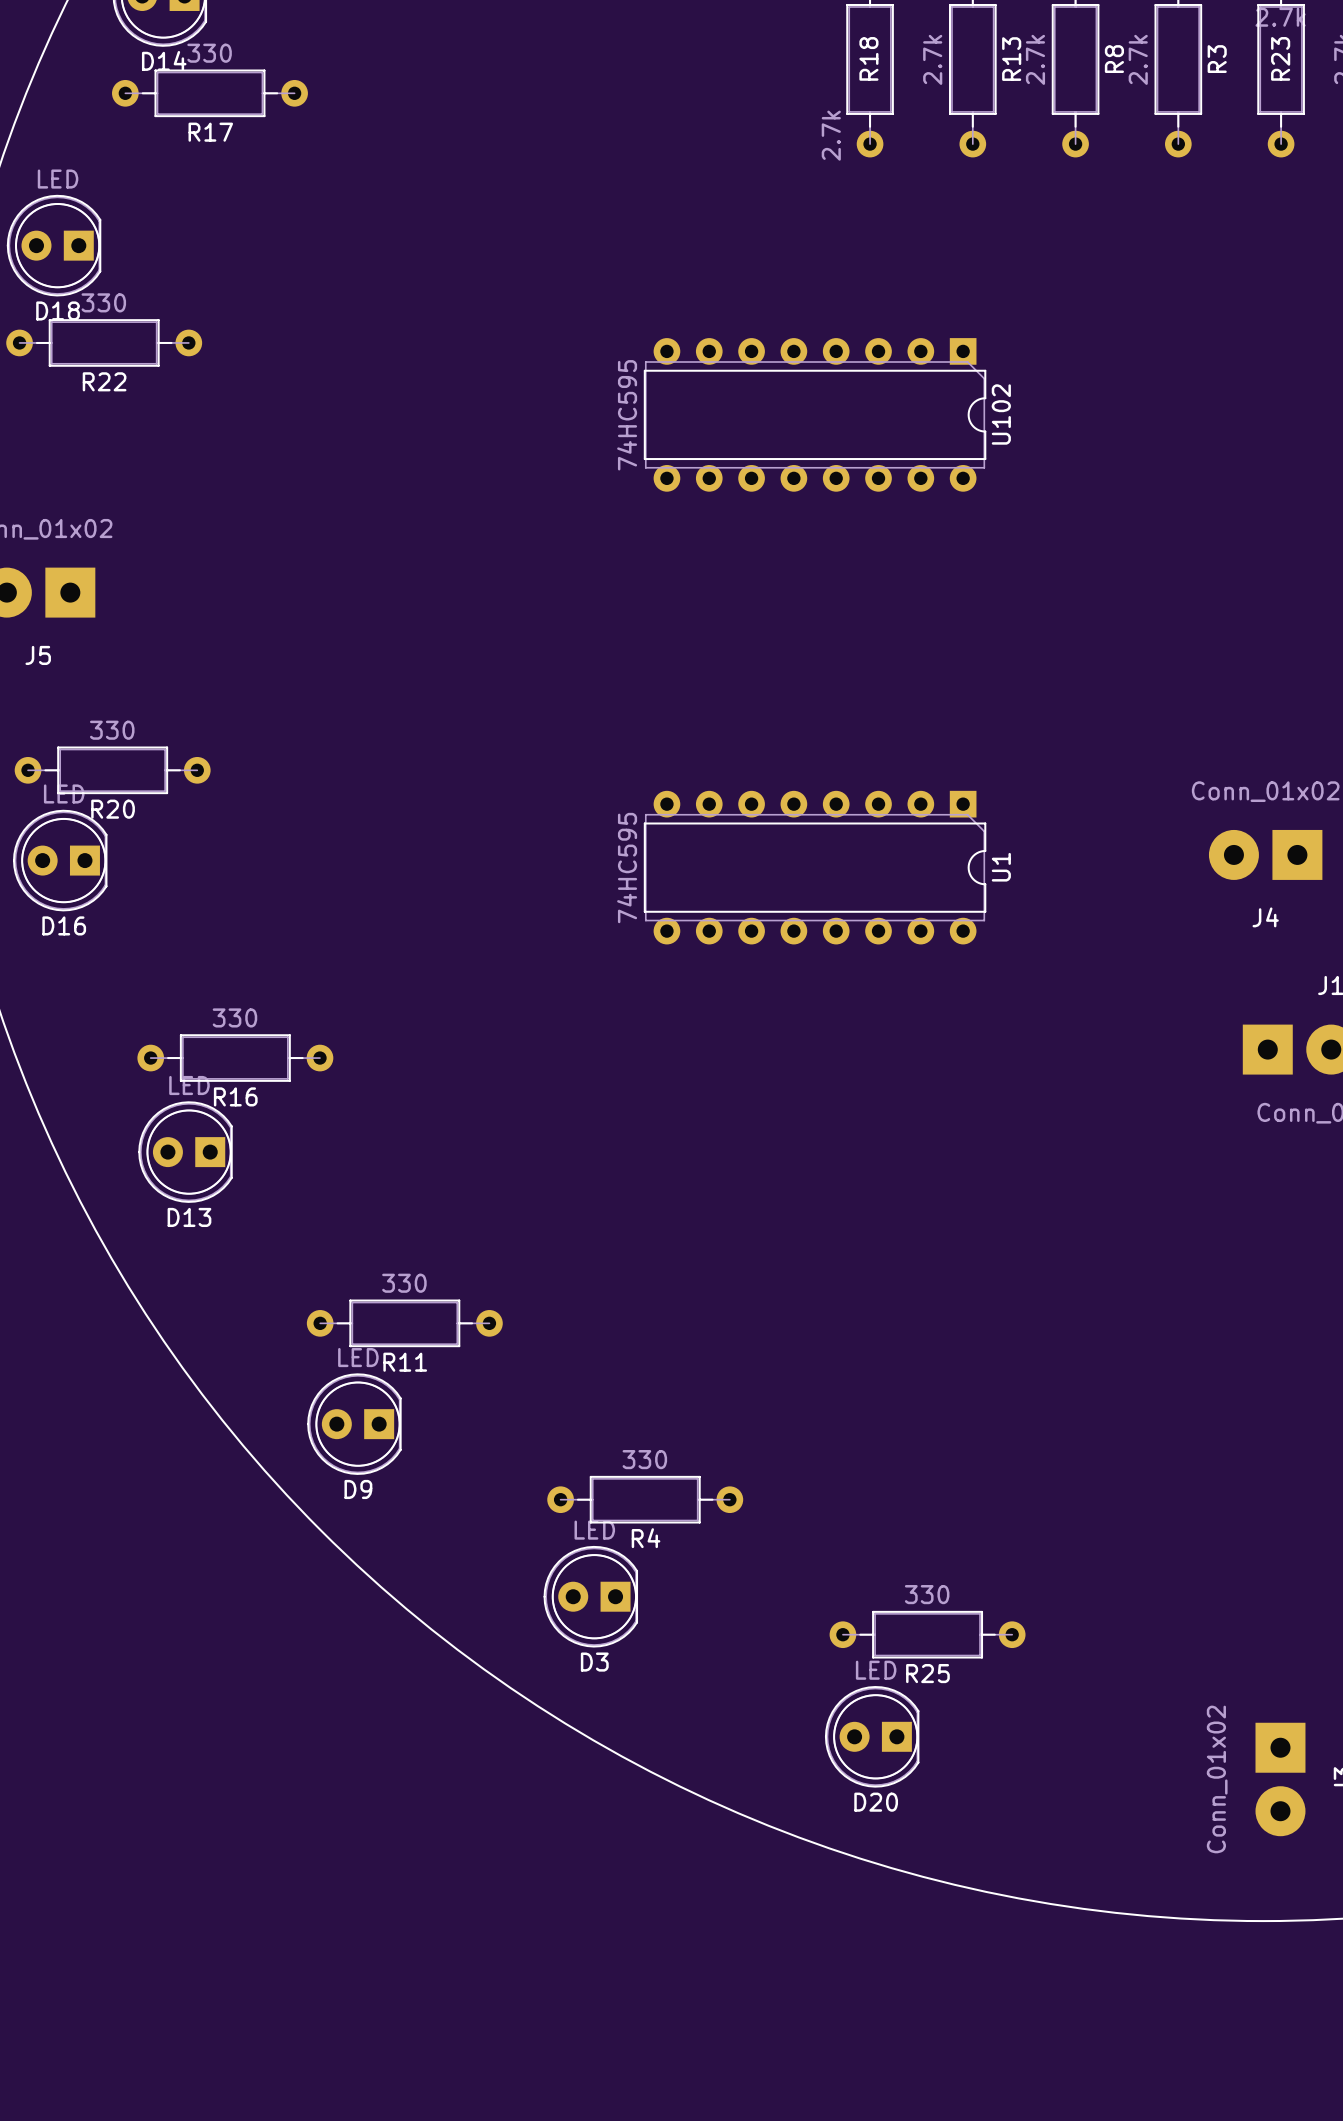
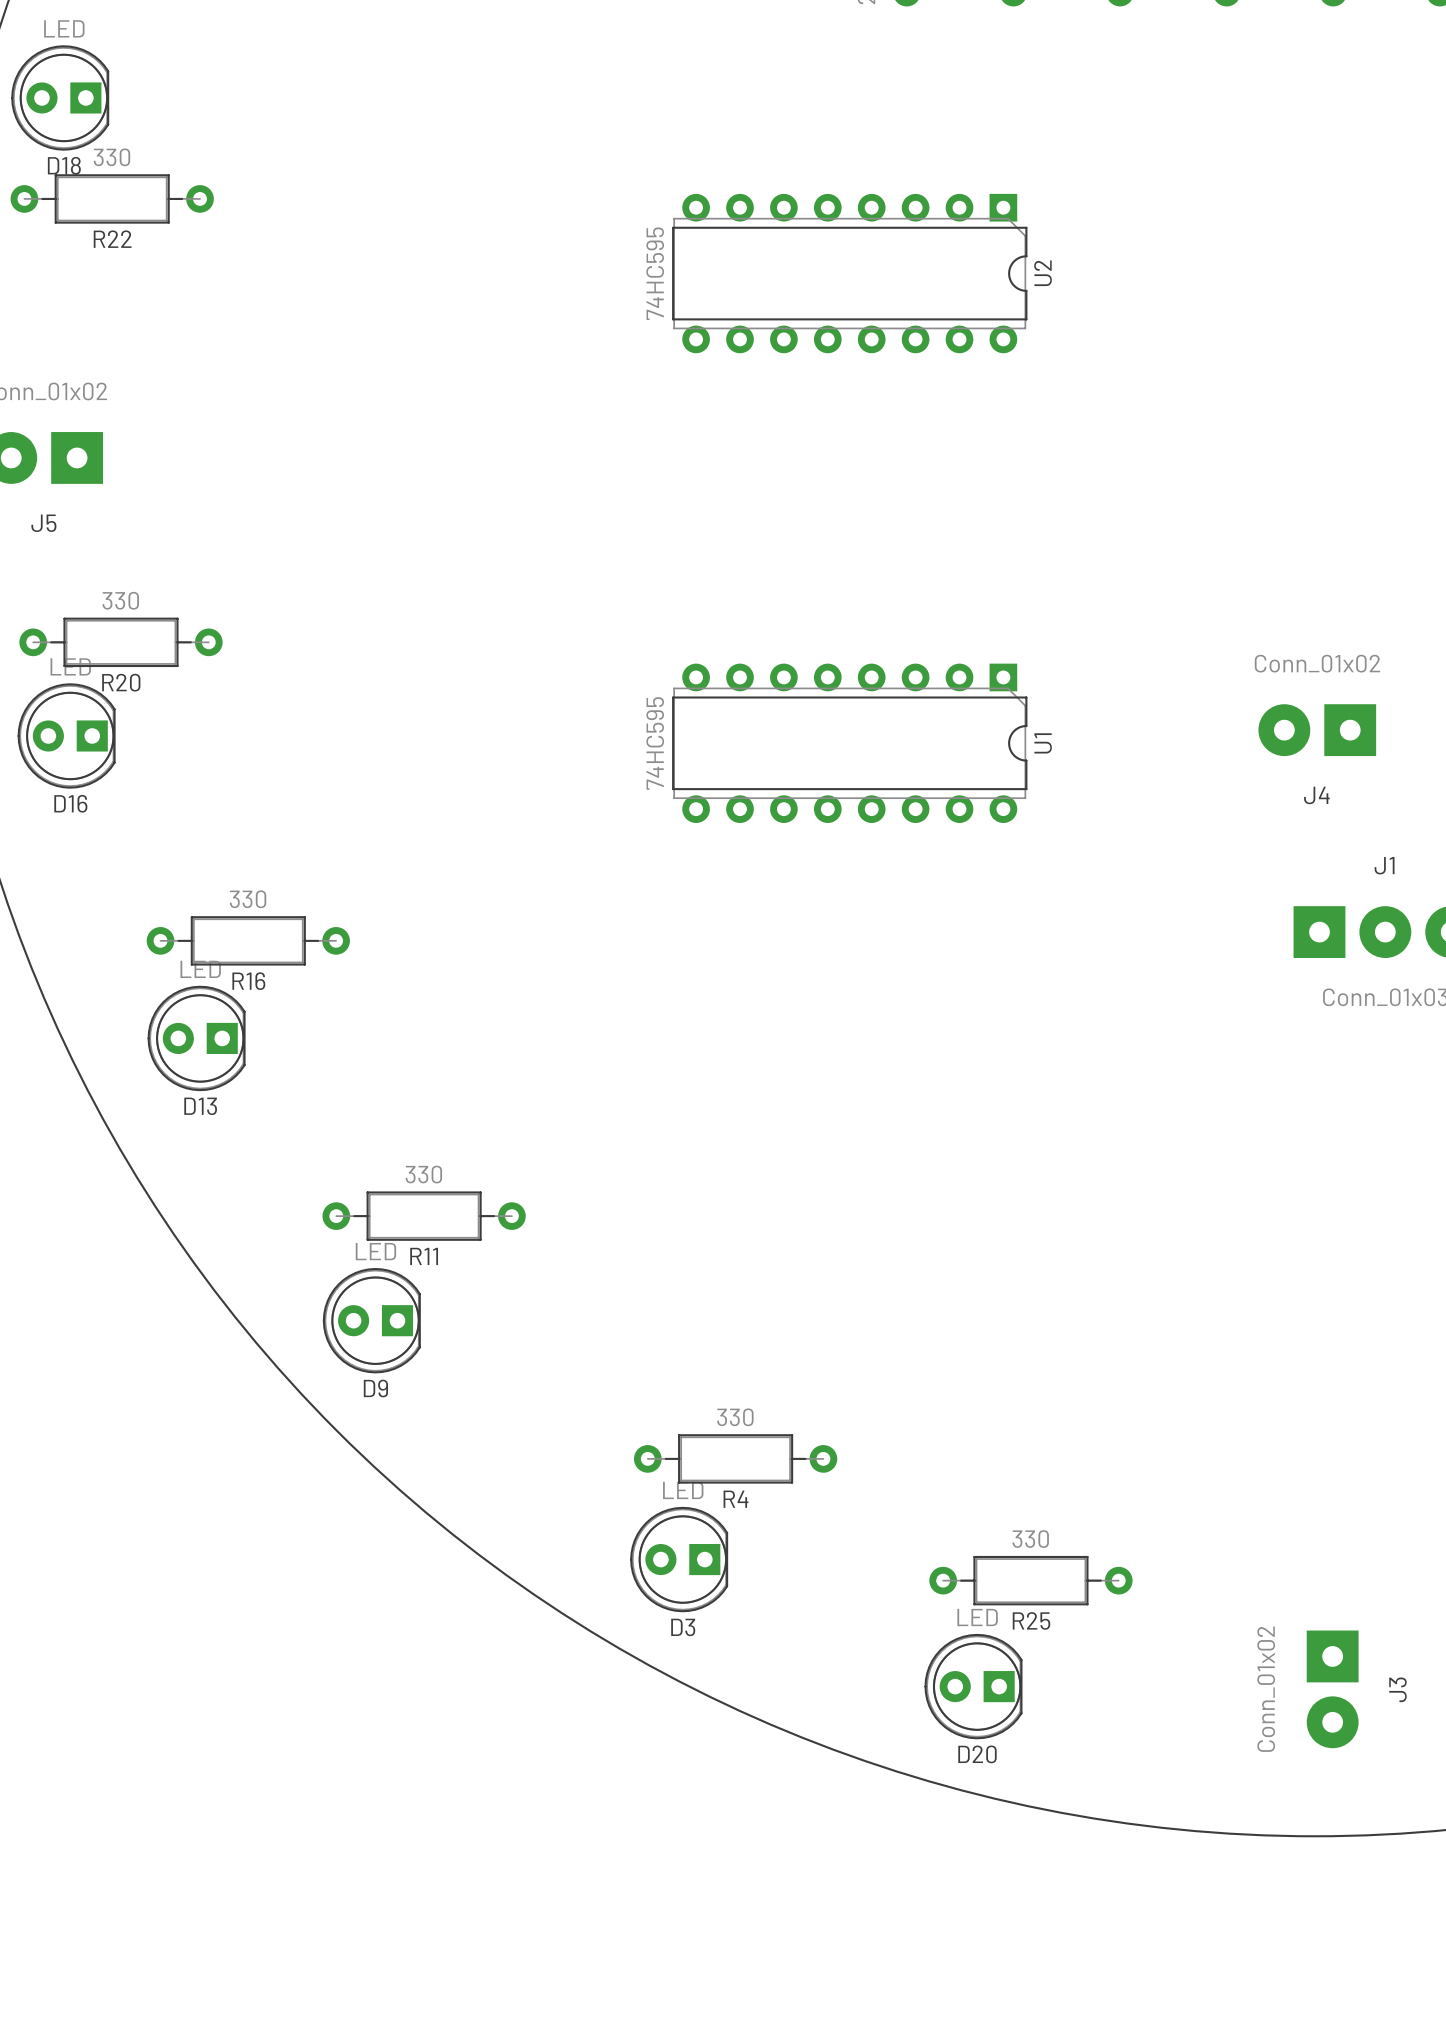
U102 name: U102 (1001, 414) -> U2 (1043, 273)
R4 position: (645, 1499) -> (735, 1458)
D3 position: (590, 1596) -> (679, 1559)
R25 position: (927, 1634) -> (1030, 1580)
D20 position: (872, 1736) -> (973, 1686)

